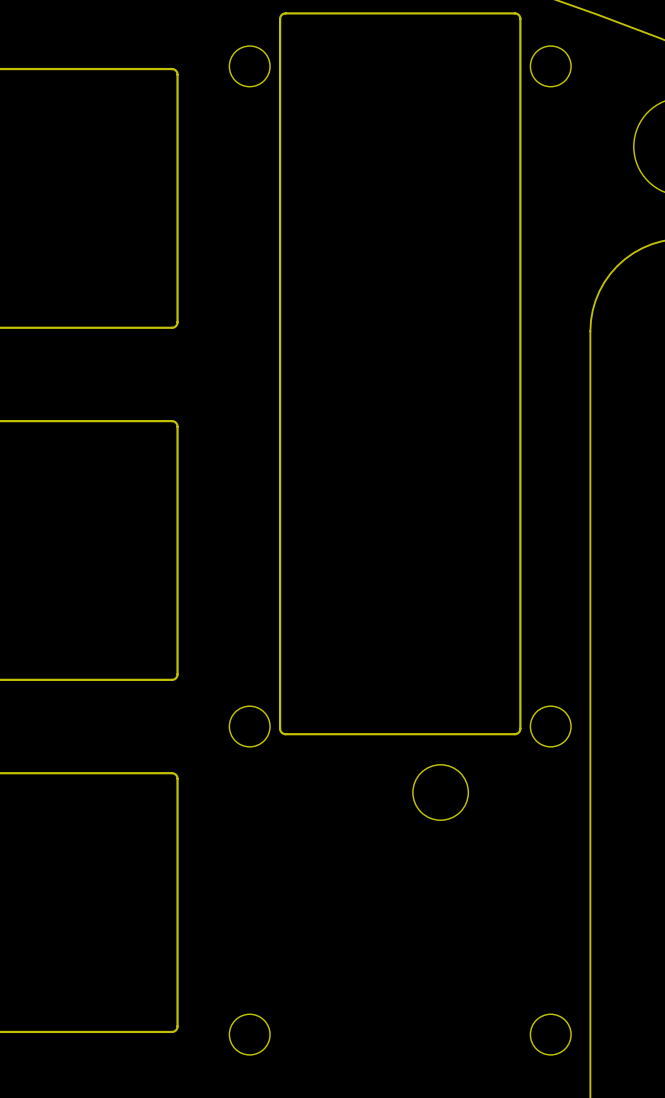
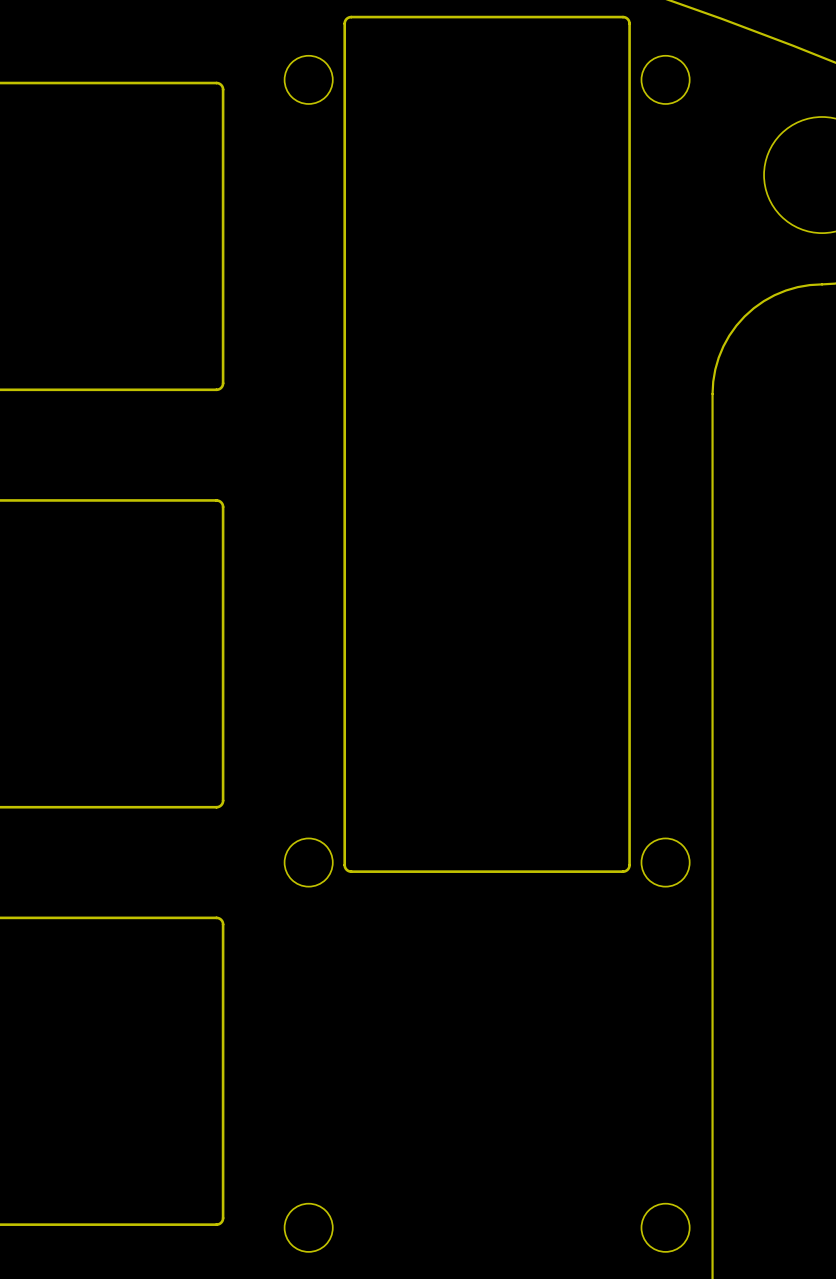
part: (400, 416) -> none

